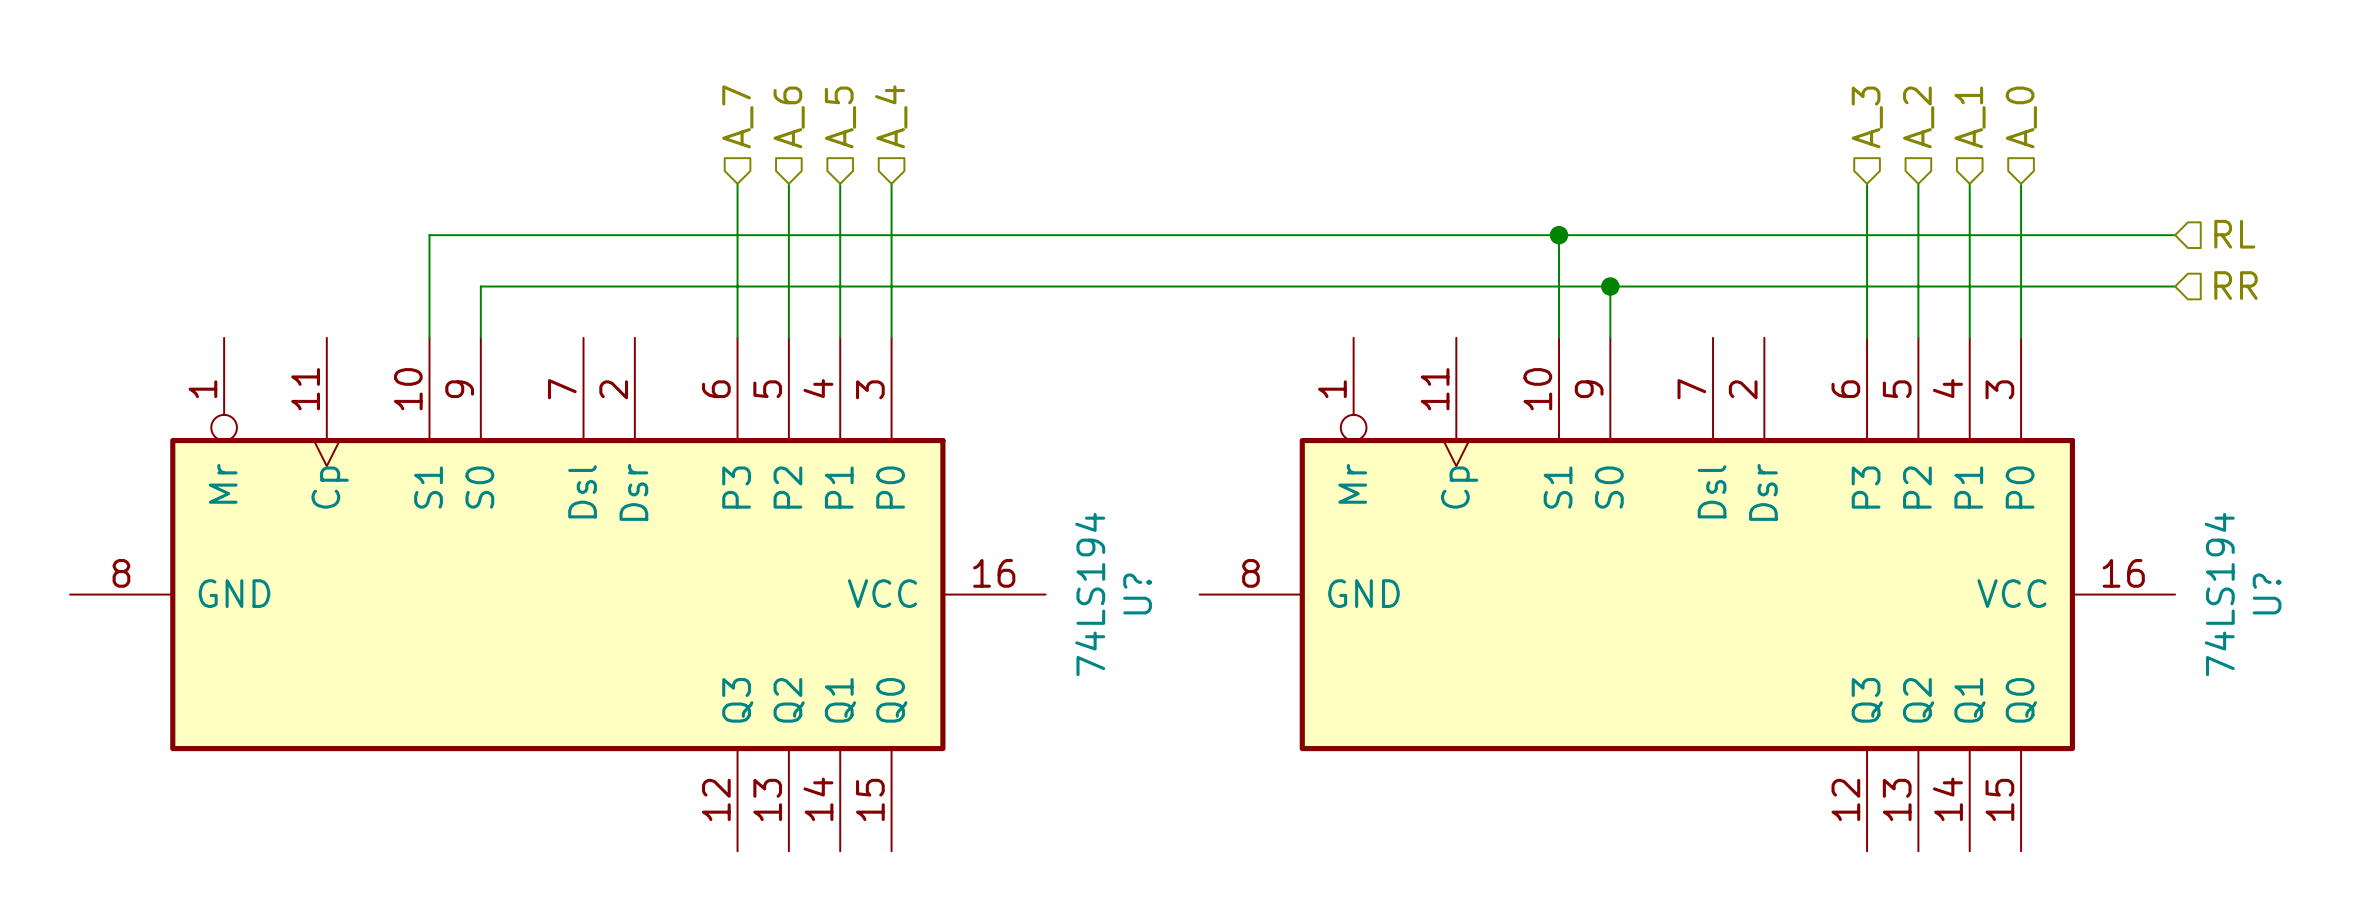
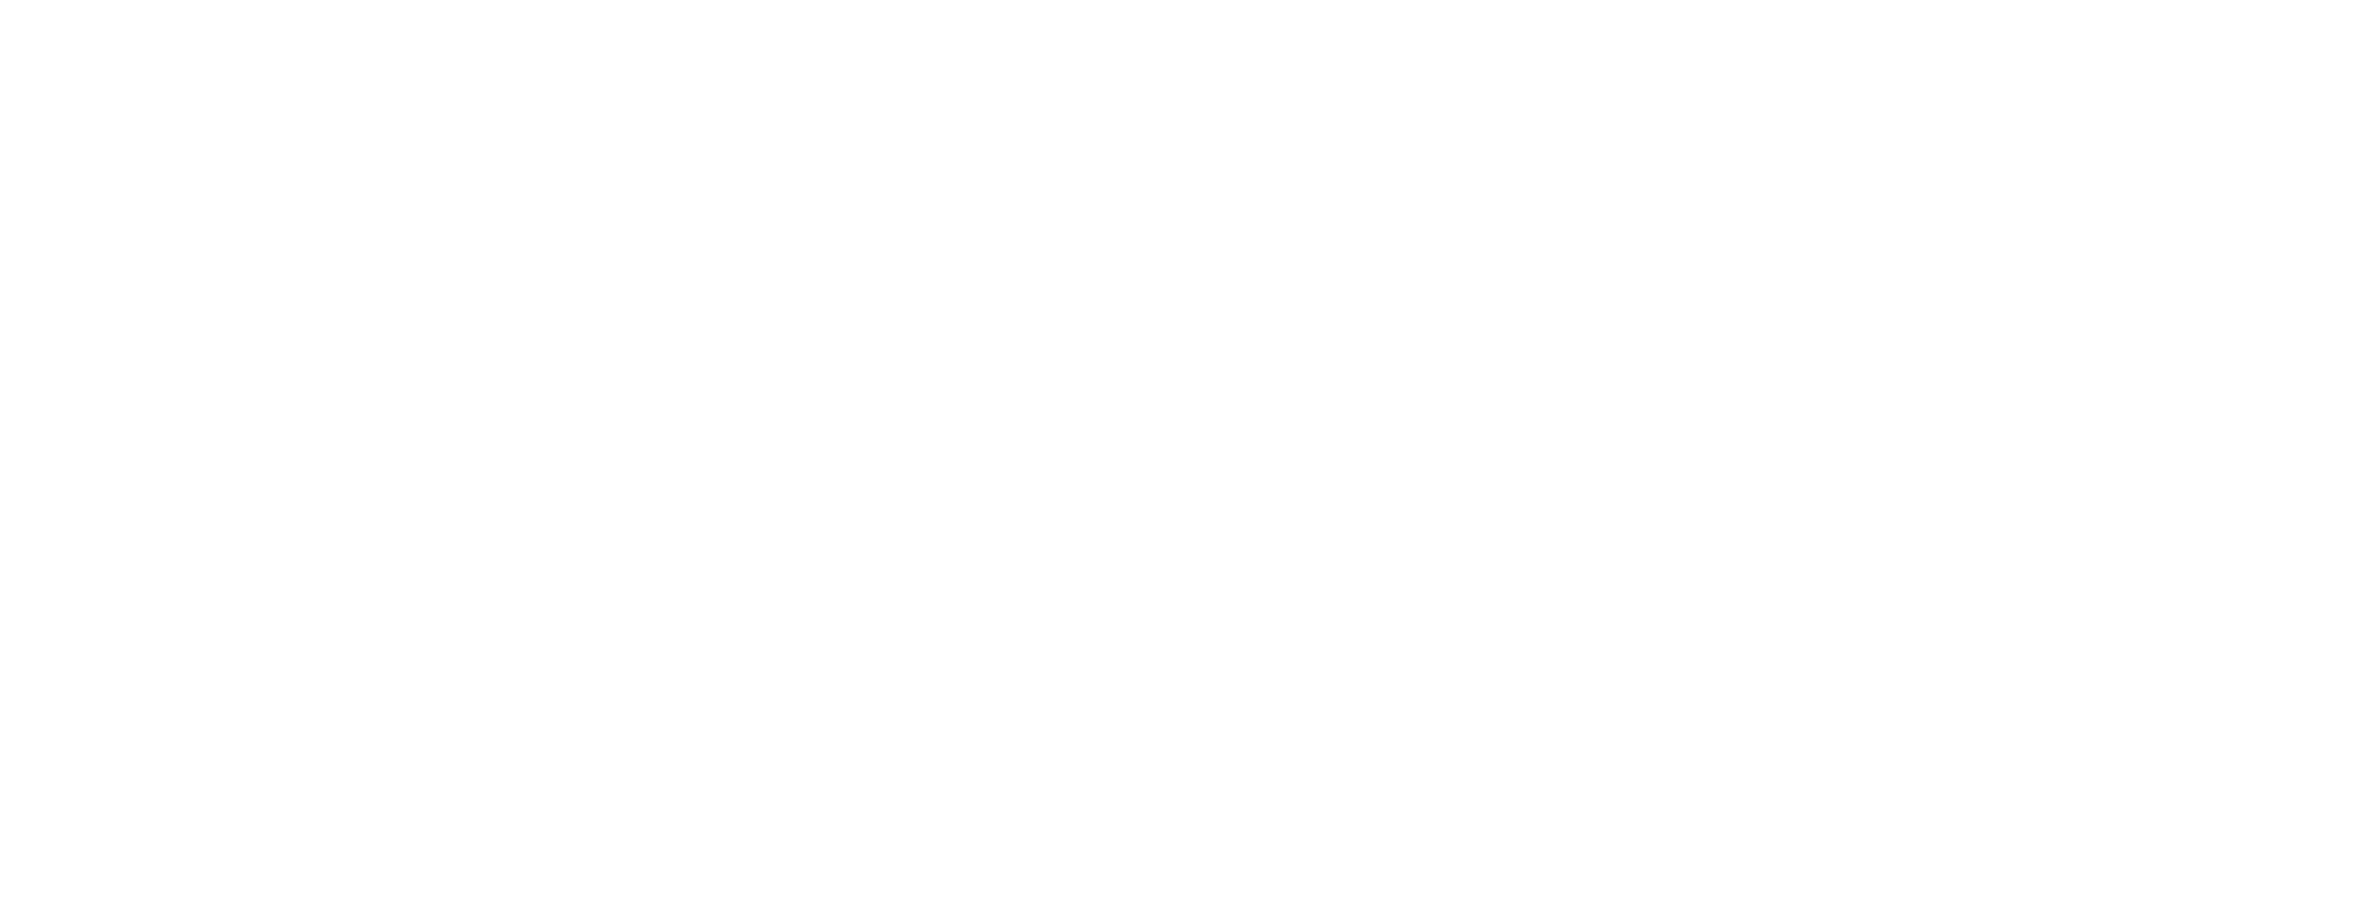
hierarchical label: A_7 (737, 116) -> none
hierarchical label: A_4 (891, 116) -> none
hierarchical label: A_6 (789, 117) -> none
hierarchical label: A_5 (840, 117) -> none
hierarchical label: A_3 (1867, 117) -> none
hierarchical label: A_2 (1918, 117) -> none
hierarchical label: A_1 (1969, 117) -> none
hierarchical label: A_0 (2021, 117) -> none
wire: (737, 183) (737, 337) -> none
wire: (788, 183) (788, 337) -> none
wire: (840, 183) (840, 337) -> none
wire: (891, 183) (891, 337) -> none
wire: (1867, 183) (1867, 337) -> none
wire: (1918, 183) (1918, 337) -> none
wire: (1969, 183) (1969, 337) -> none
wire: (2021, 183) (2021, 337) -> none
hierarchical label: RL (2234, 234) -> none
wire: (1559, 235) (1559, 337) -> none
junction: (1559, 235) -> none
wire: (2175, 235) (429, 235) (429, 337) -> none
hierarchical label: RR (2236, 285) -> none
wire: (1610, 286) (1610, 337) -> none
junction: (1610, 286) -> none
wire: (2175, 286) (480, 286) (480, 337) -> none
U?: 74LS194 (557, 594) -> none
U?: 74LS194 (1687, 594) -> none

